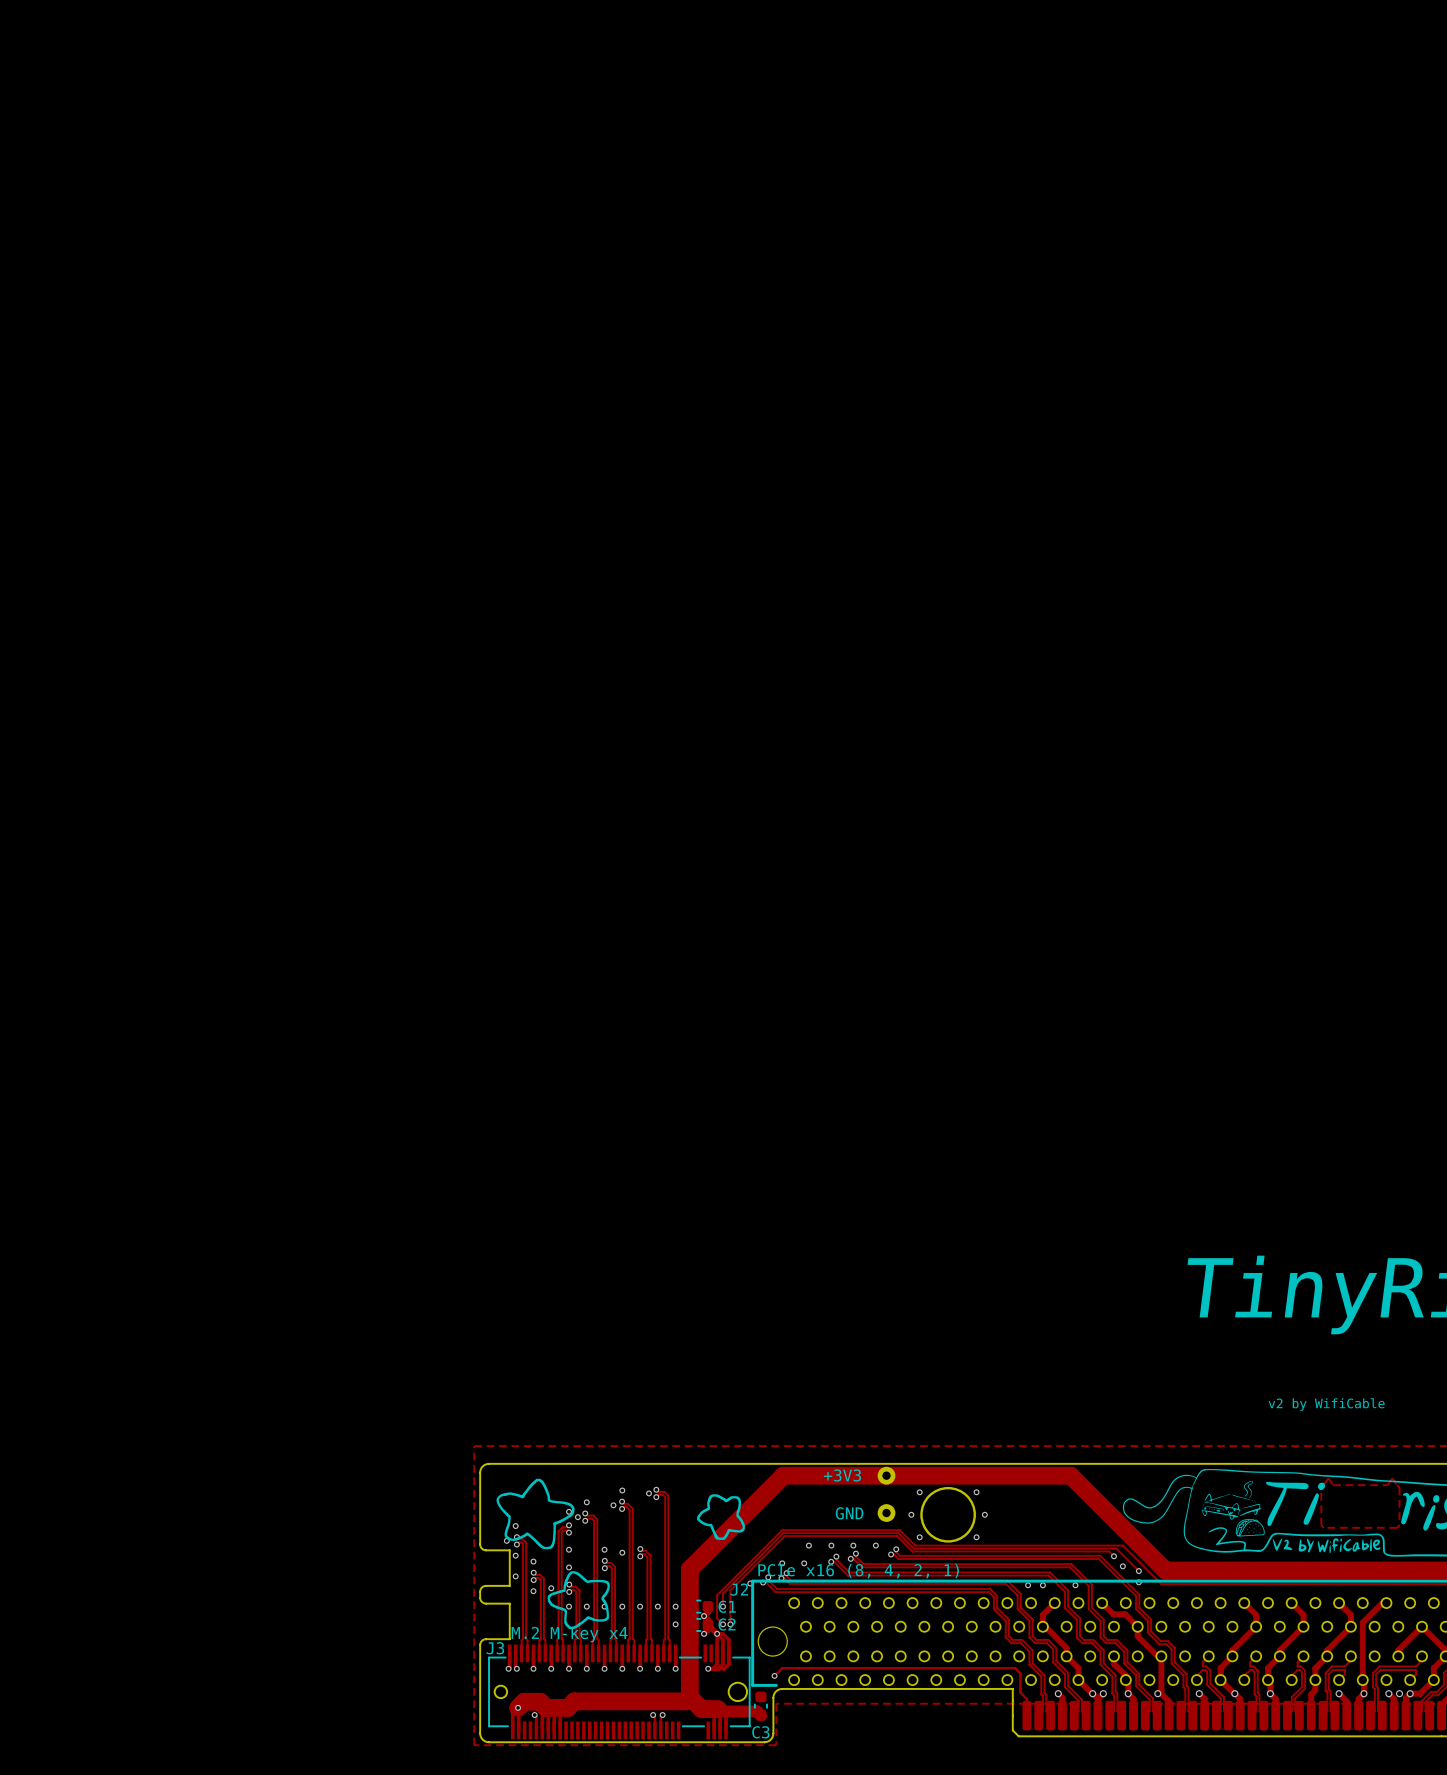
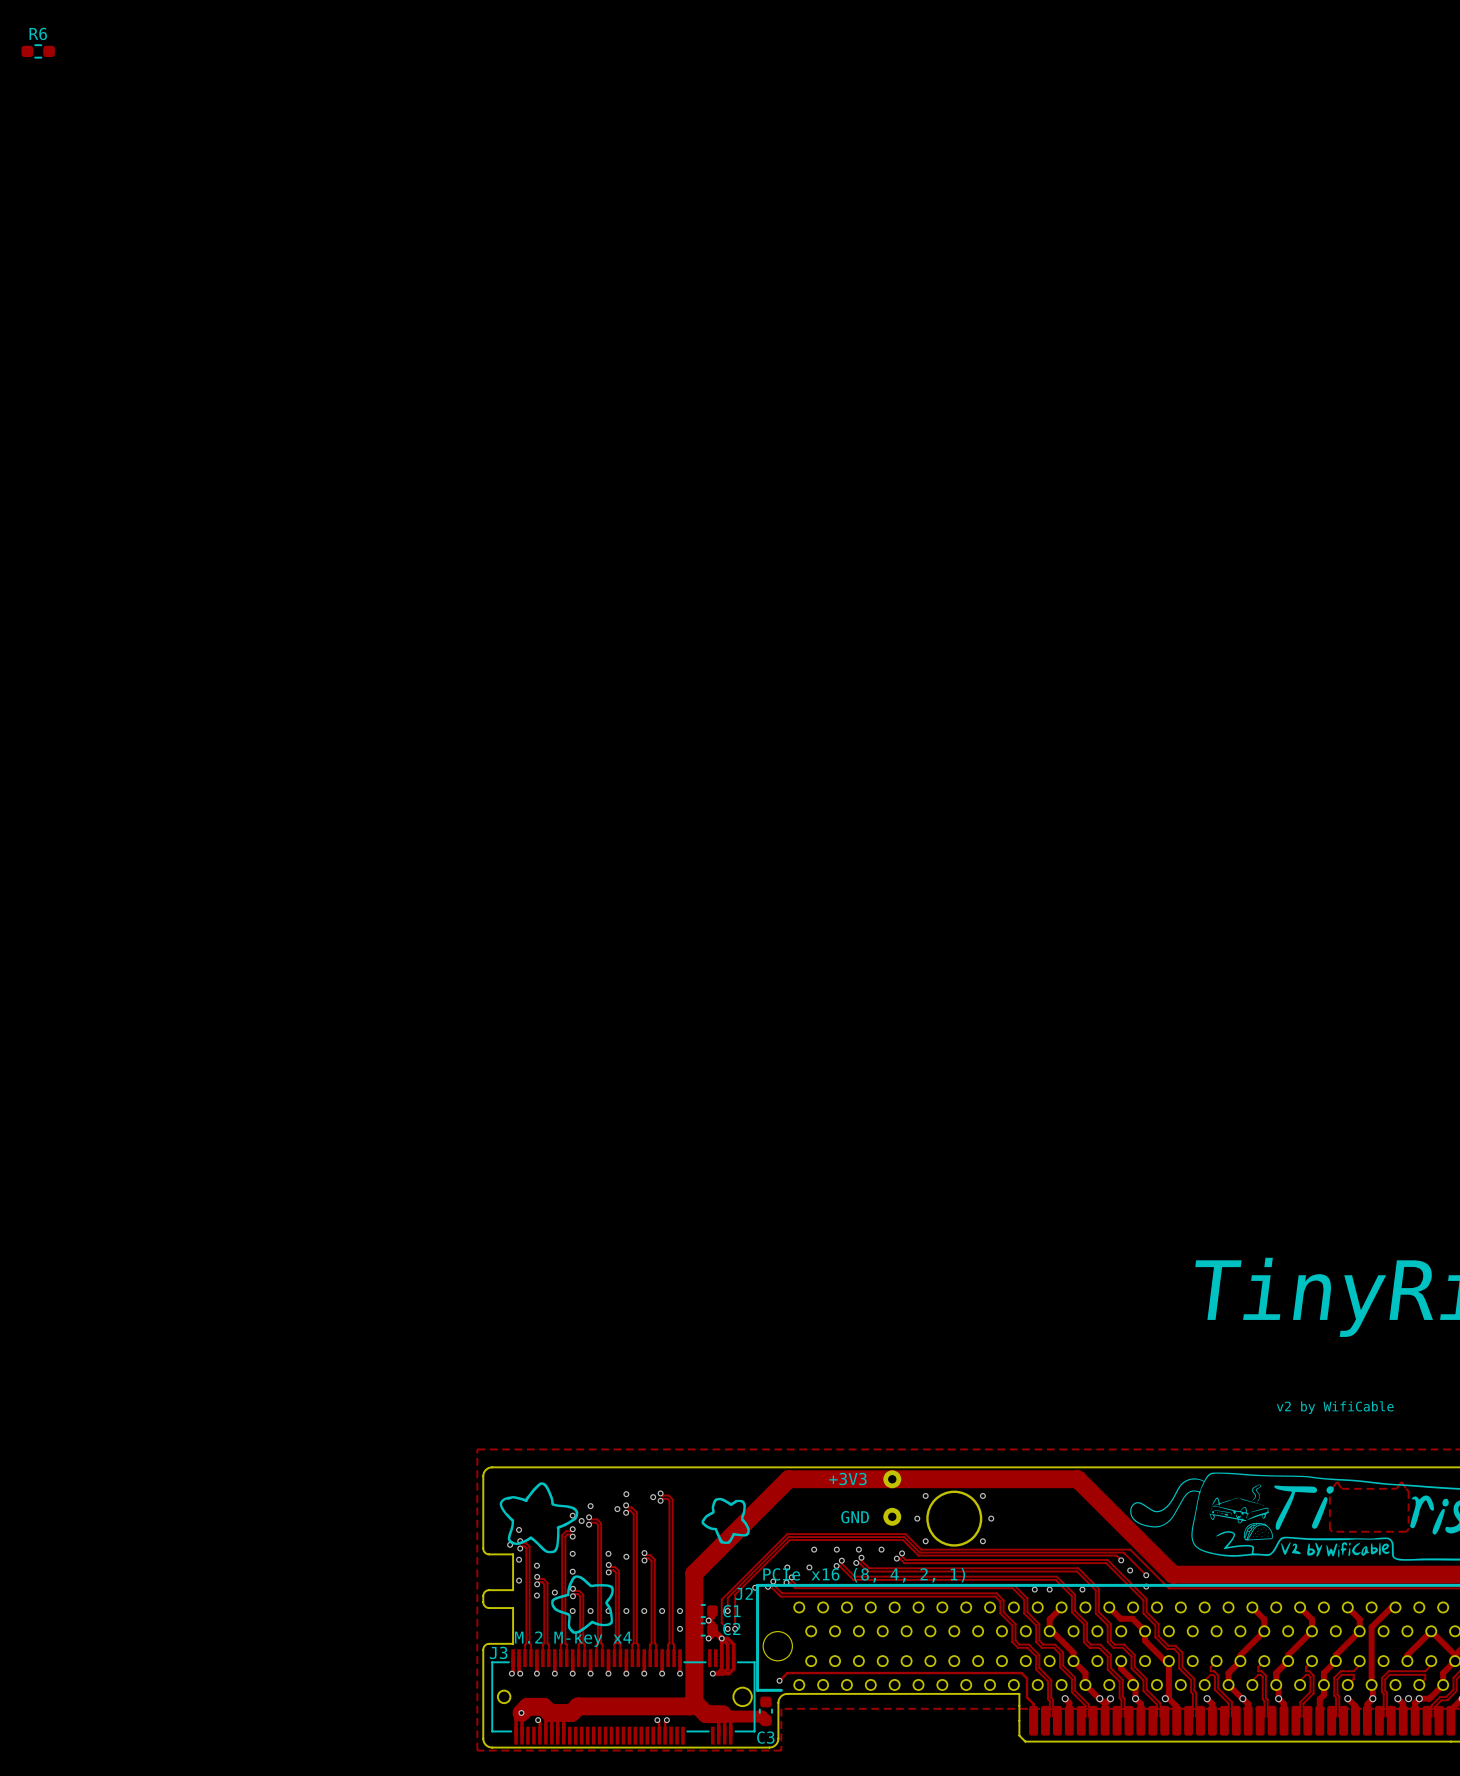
R6: none -> (38, 51)

